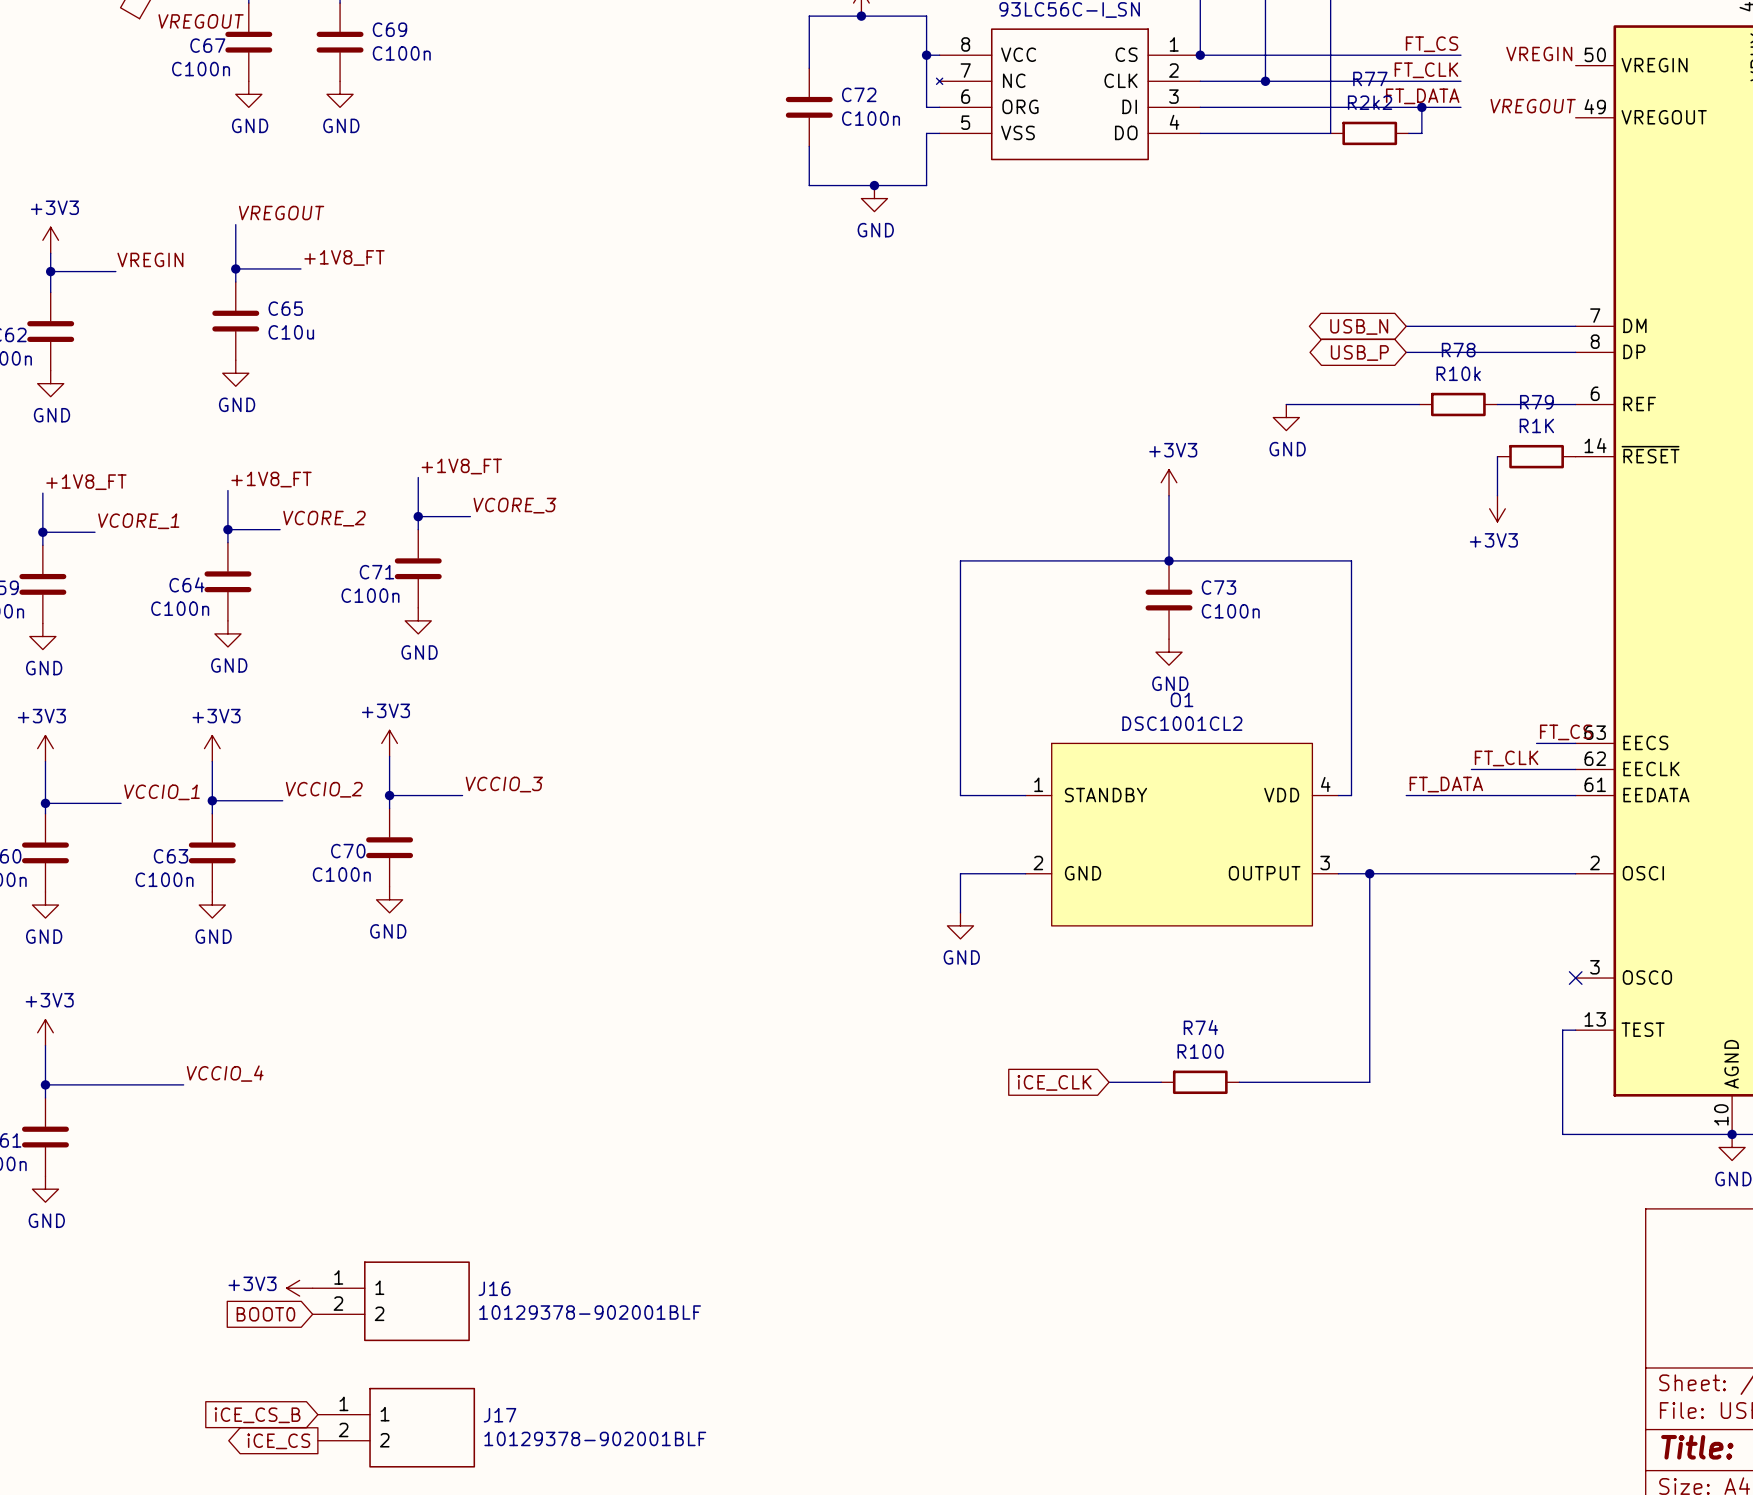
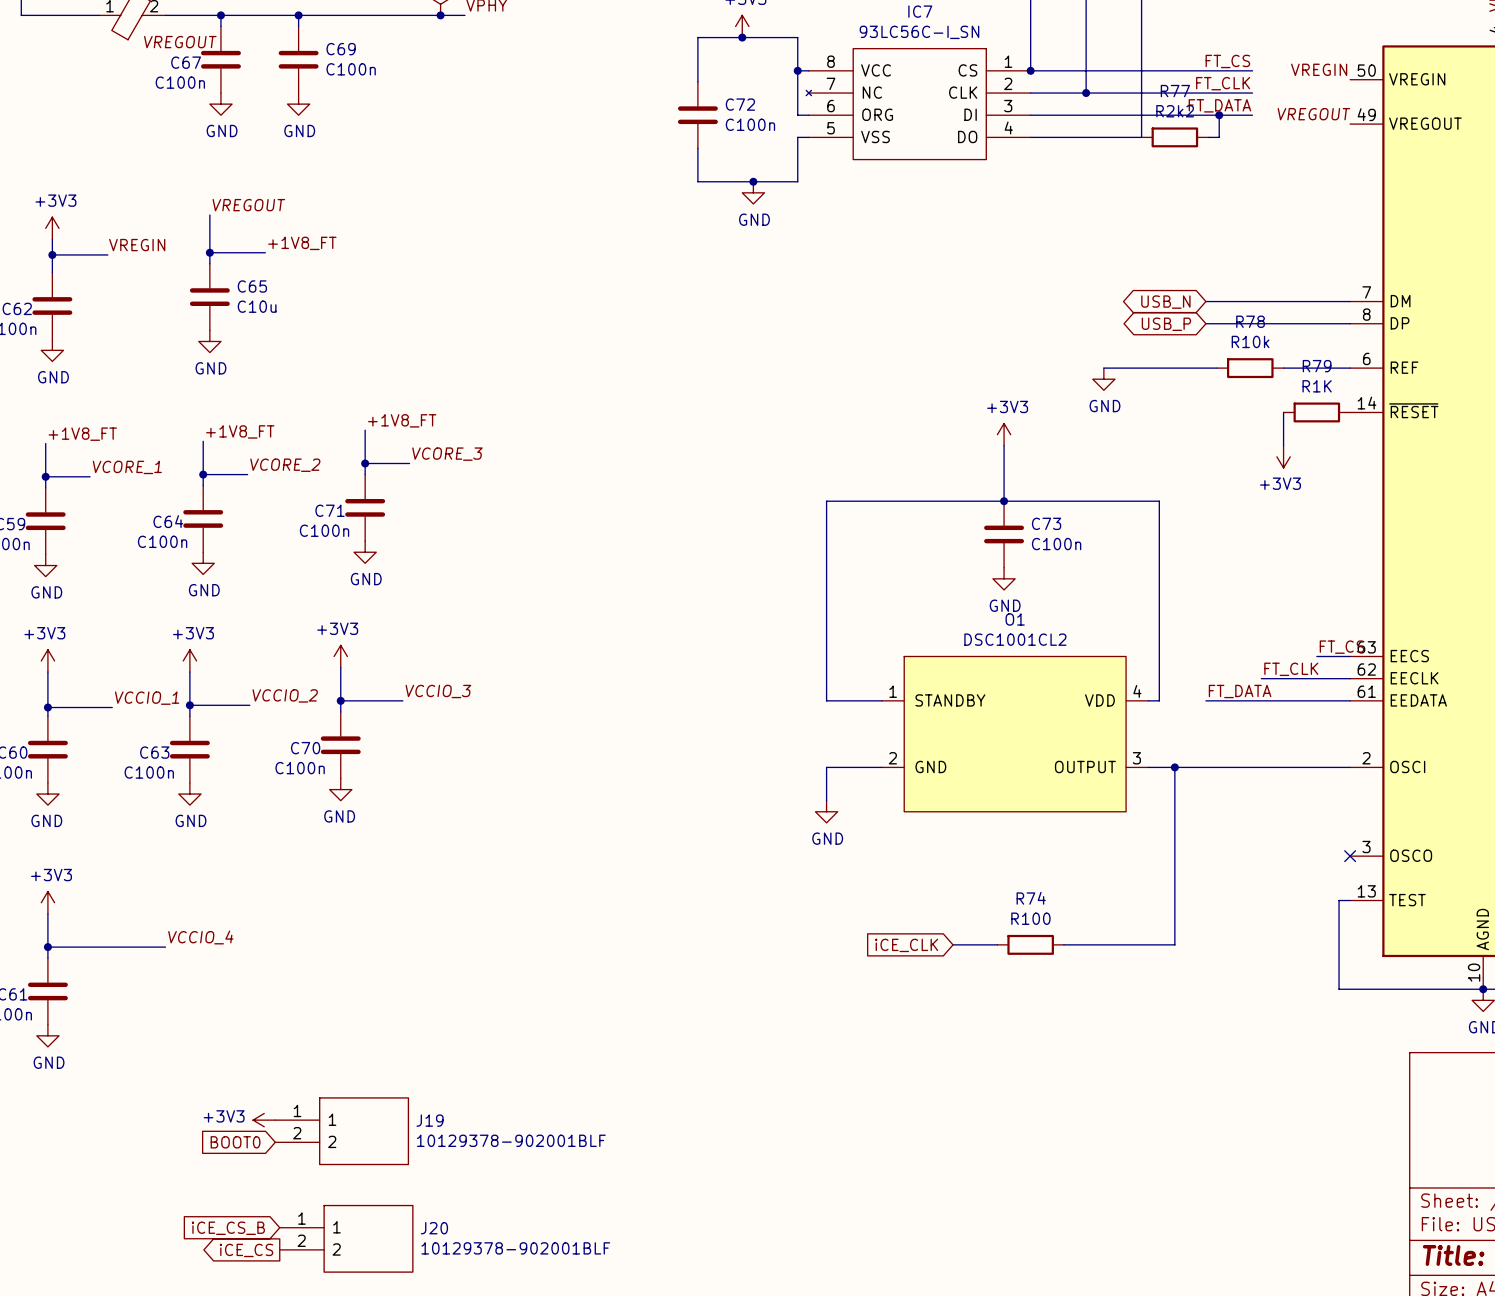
J16 name: J16 (494, 1288) -> J19 (430, 1120)
J17 name: J17 (500, 1415) -> J20 (434, 1228)

